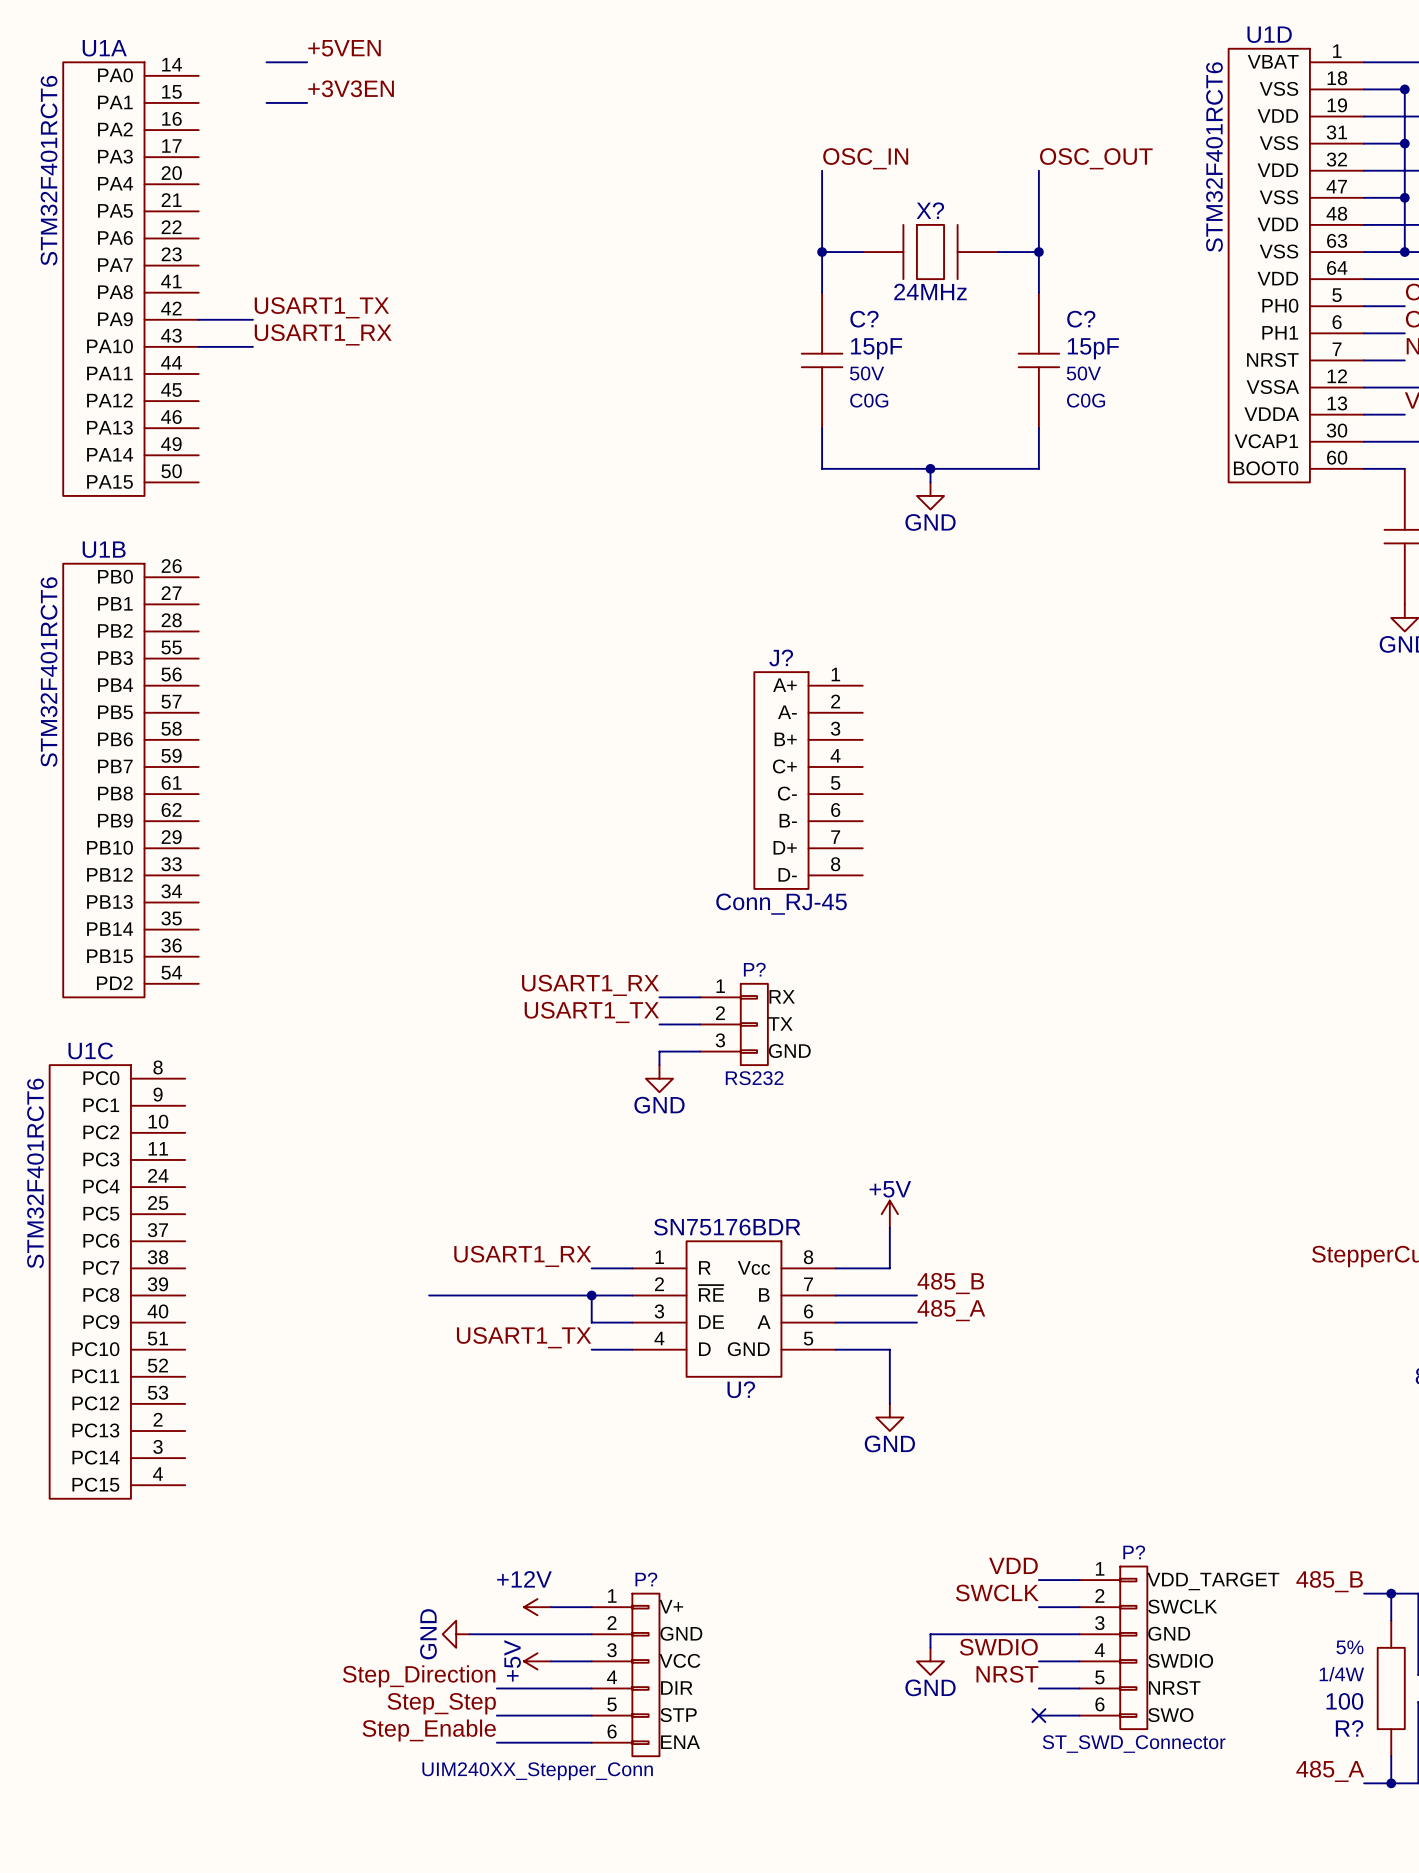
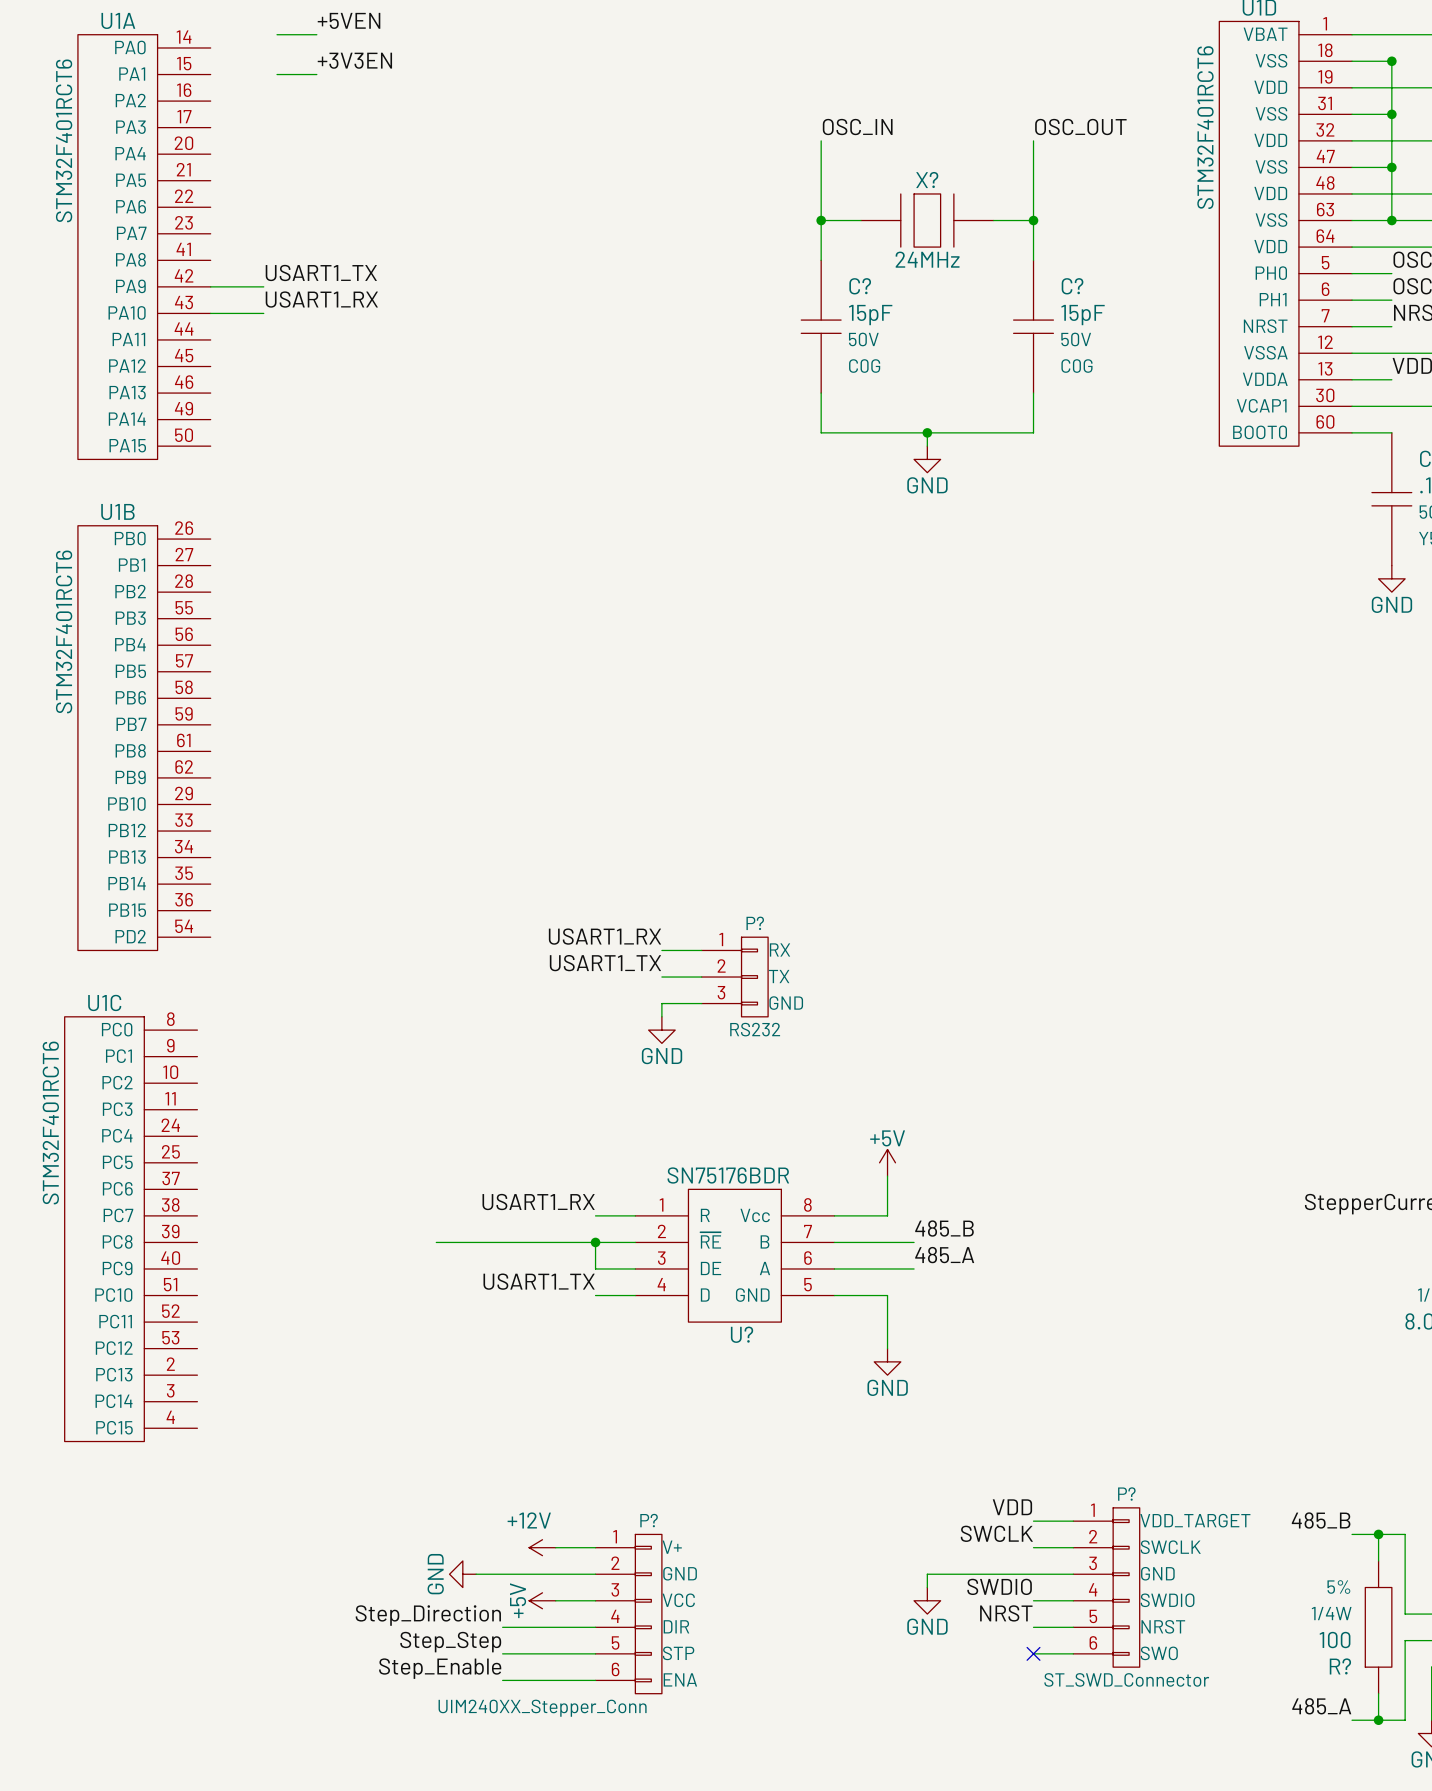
J?: Conn_RJ-45 (808, 780) -> none

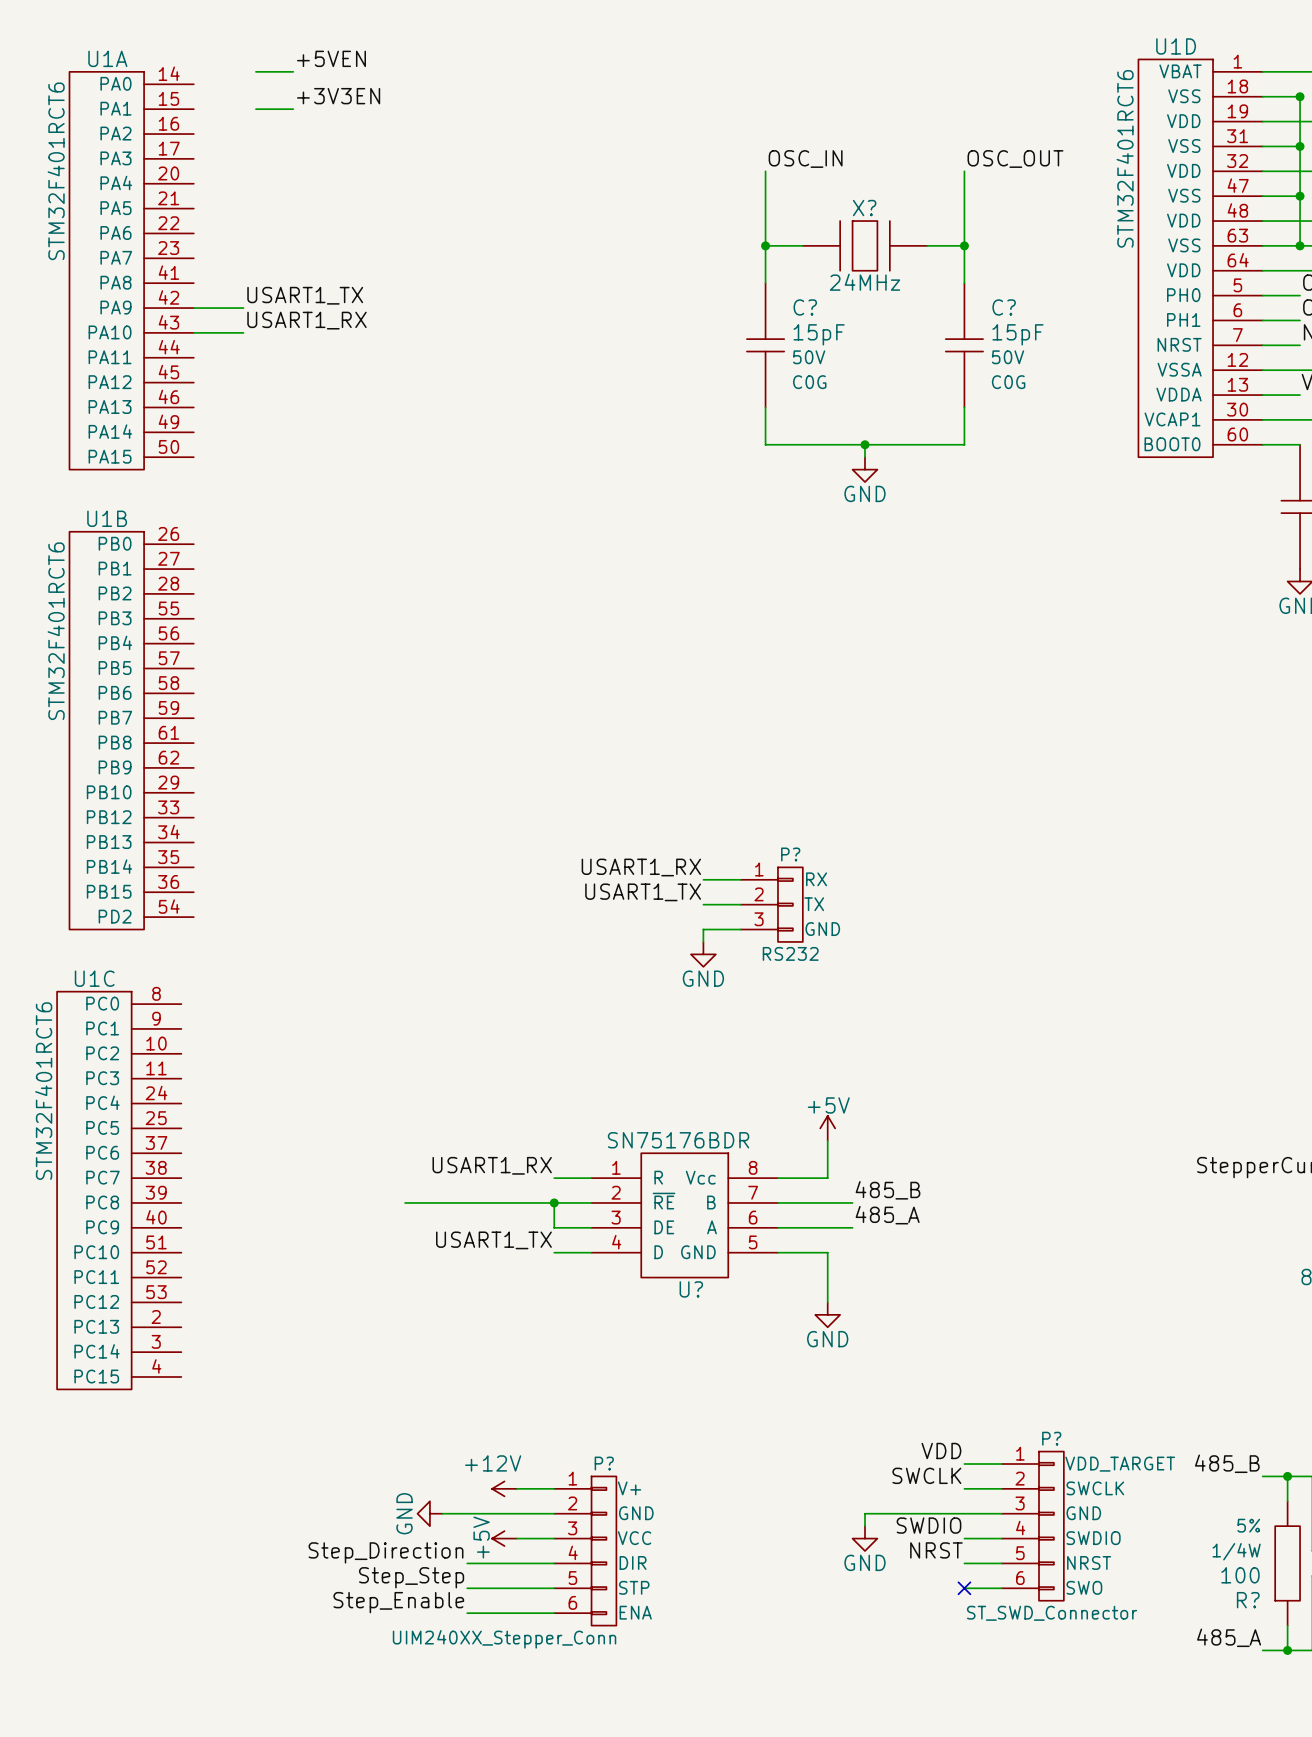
label position: USART1_RX (604, 936) -> USART1_RX (641, 867)
wire: (661, 950) (701, 950) -> (703, 904) (740, 904)
label position: USART1_TX (605, 963) -> USART1_TX (643, 892)
wire: (661, 977) (701, 977) -> (703, 879) (740, 879)
P? position: (734, 977) -> (771, 904)
wire: (701, 1003) (661, 1003) (661, 1016) -> (740, 929) (703, 929) (703, 941)
power symbol position: GND (661, 1030) -> GND (703, 954)

